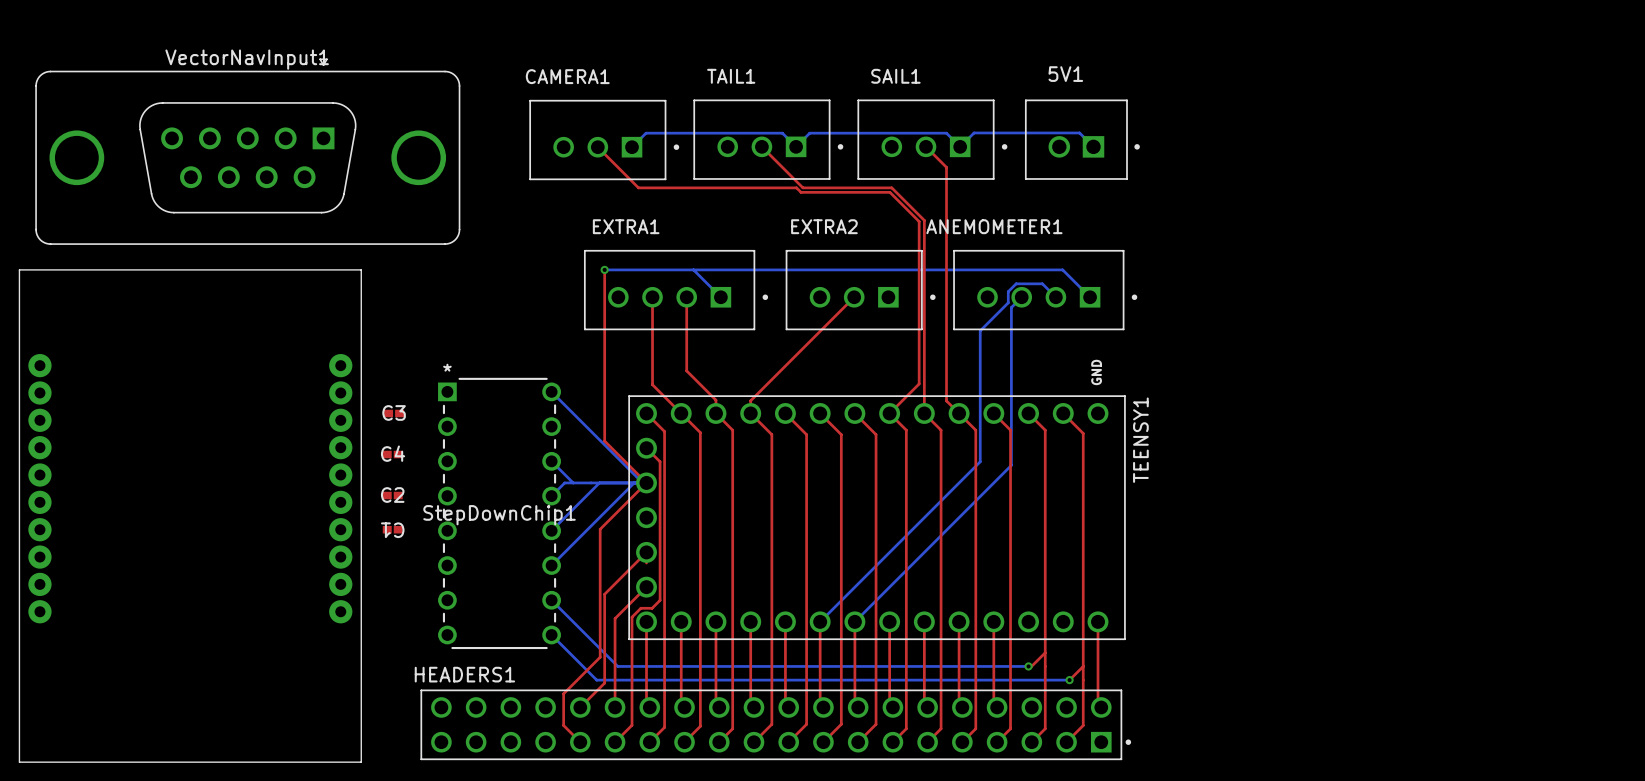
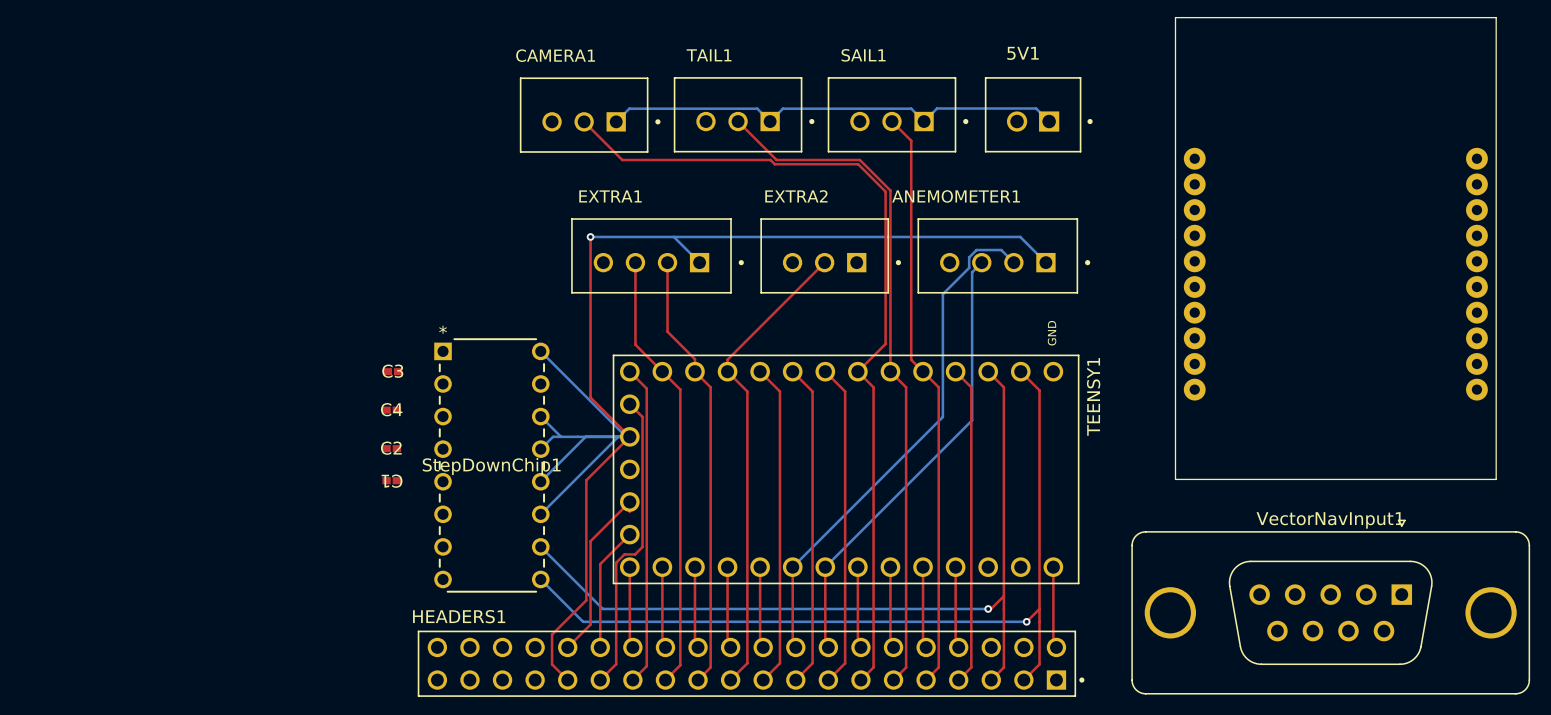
VectorNavInput1 position: (247, 151) -> (1330, 607)
part: none -> (1335, 248)
part: (190, 516) -> none

